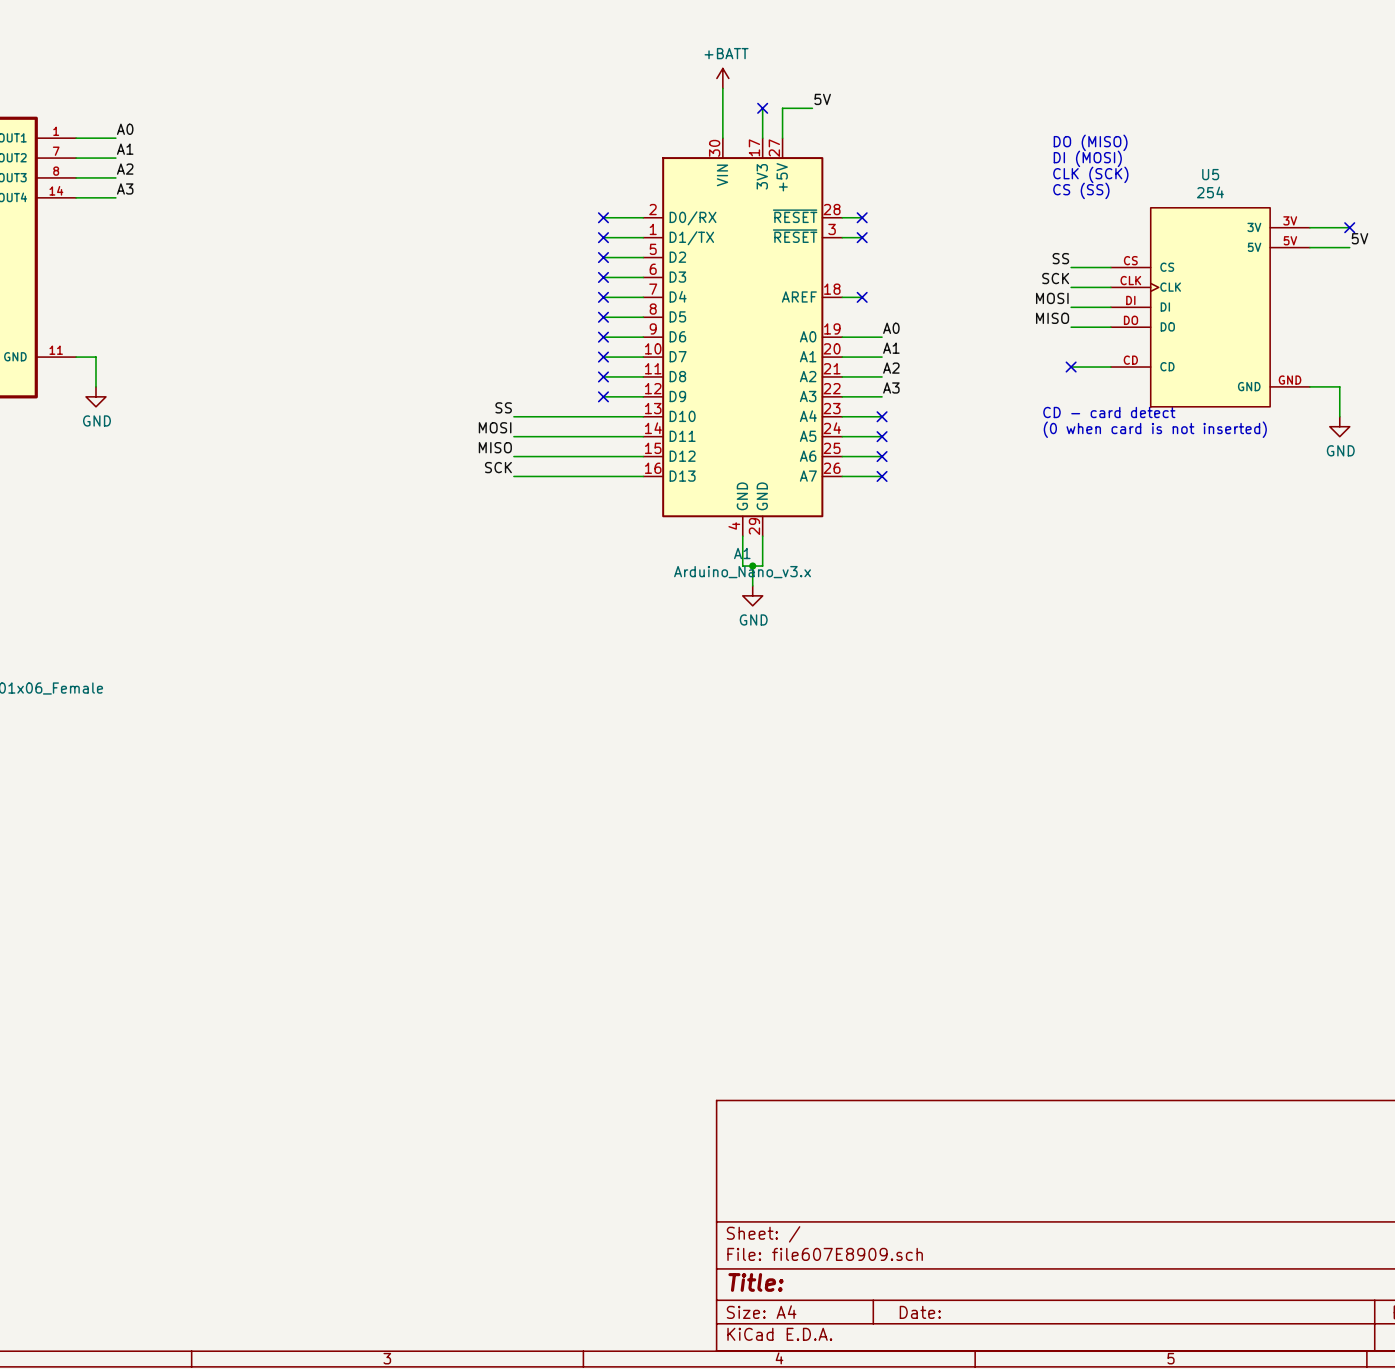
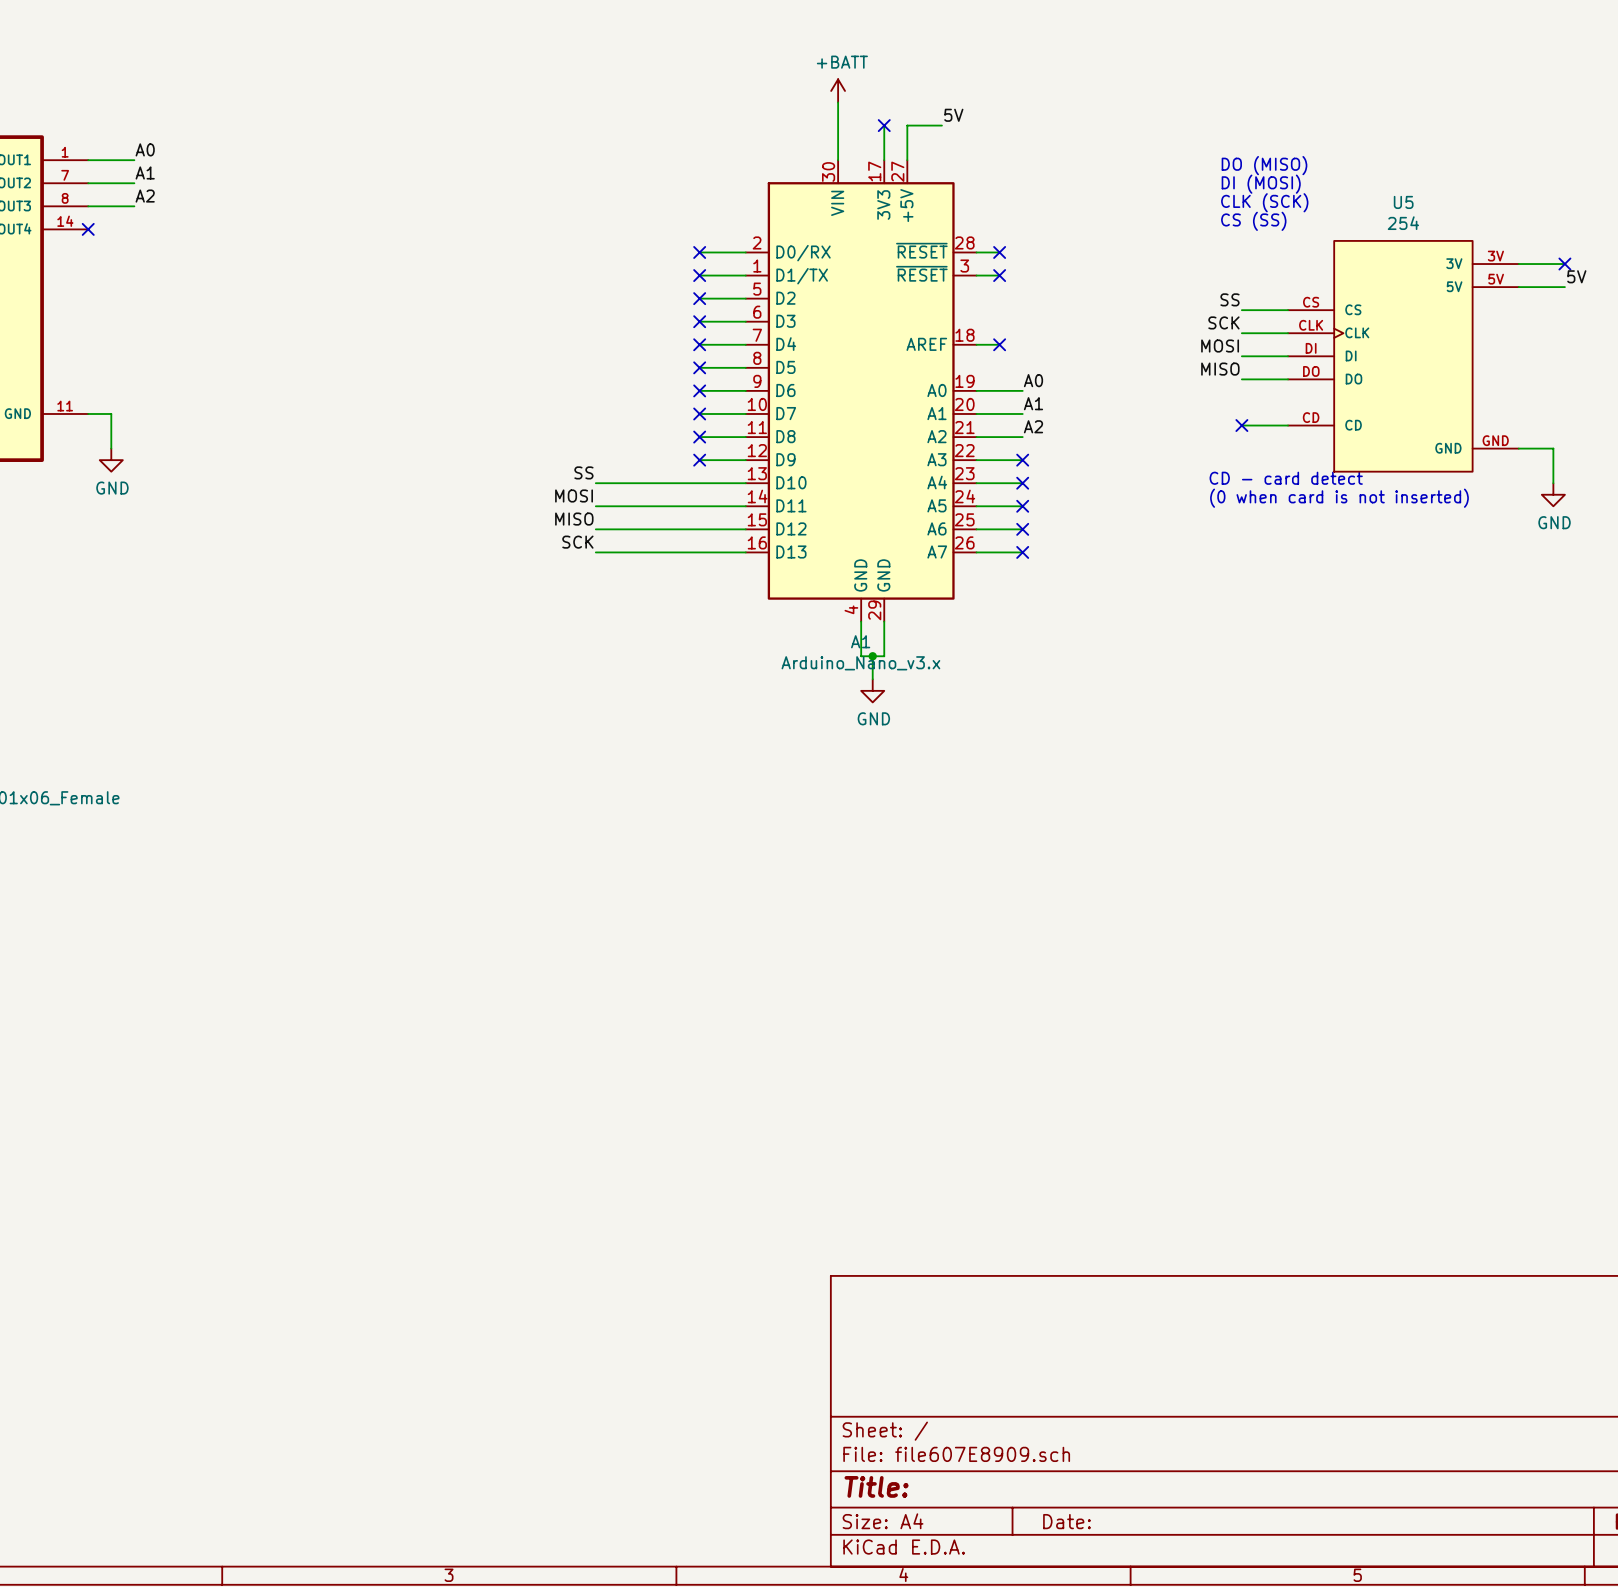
label: A3 (125, 188) -> none
wire: (76, 197) (115, 197) -> none
no-connect mark: none -> (88, 229)
label: A3 (891, 387) -> none
no-connect mark: none -> (1022, 460)

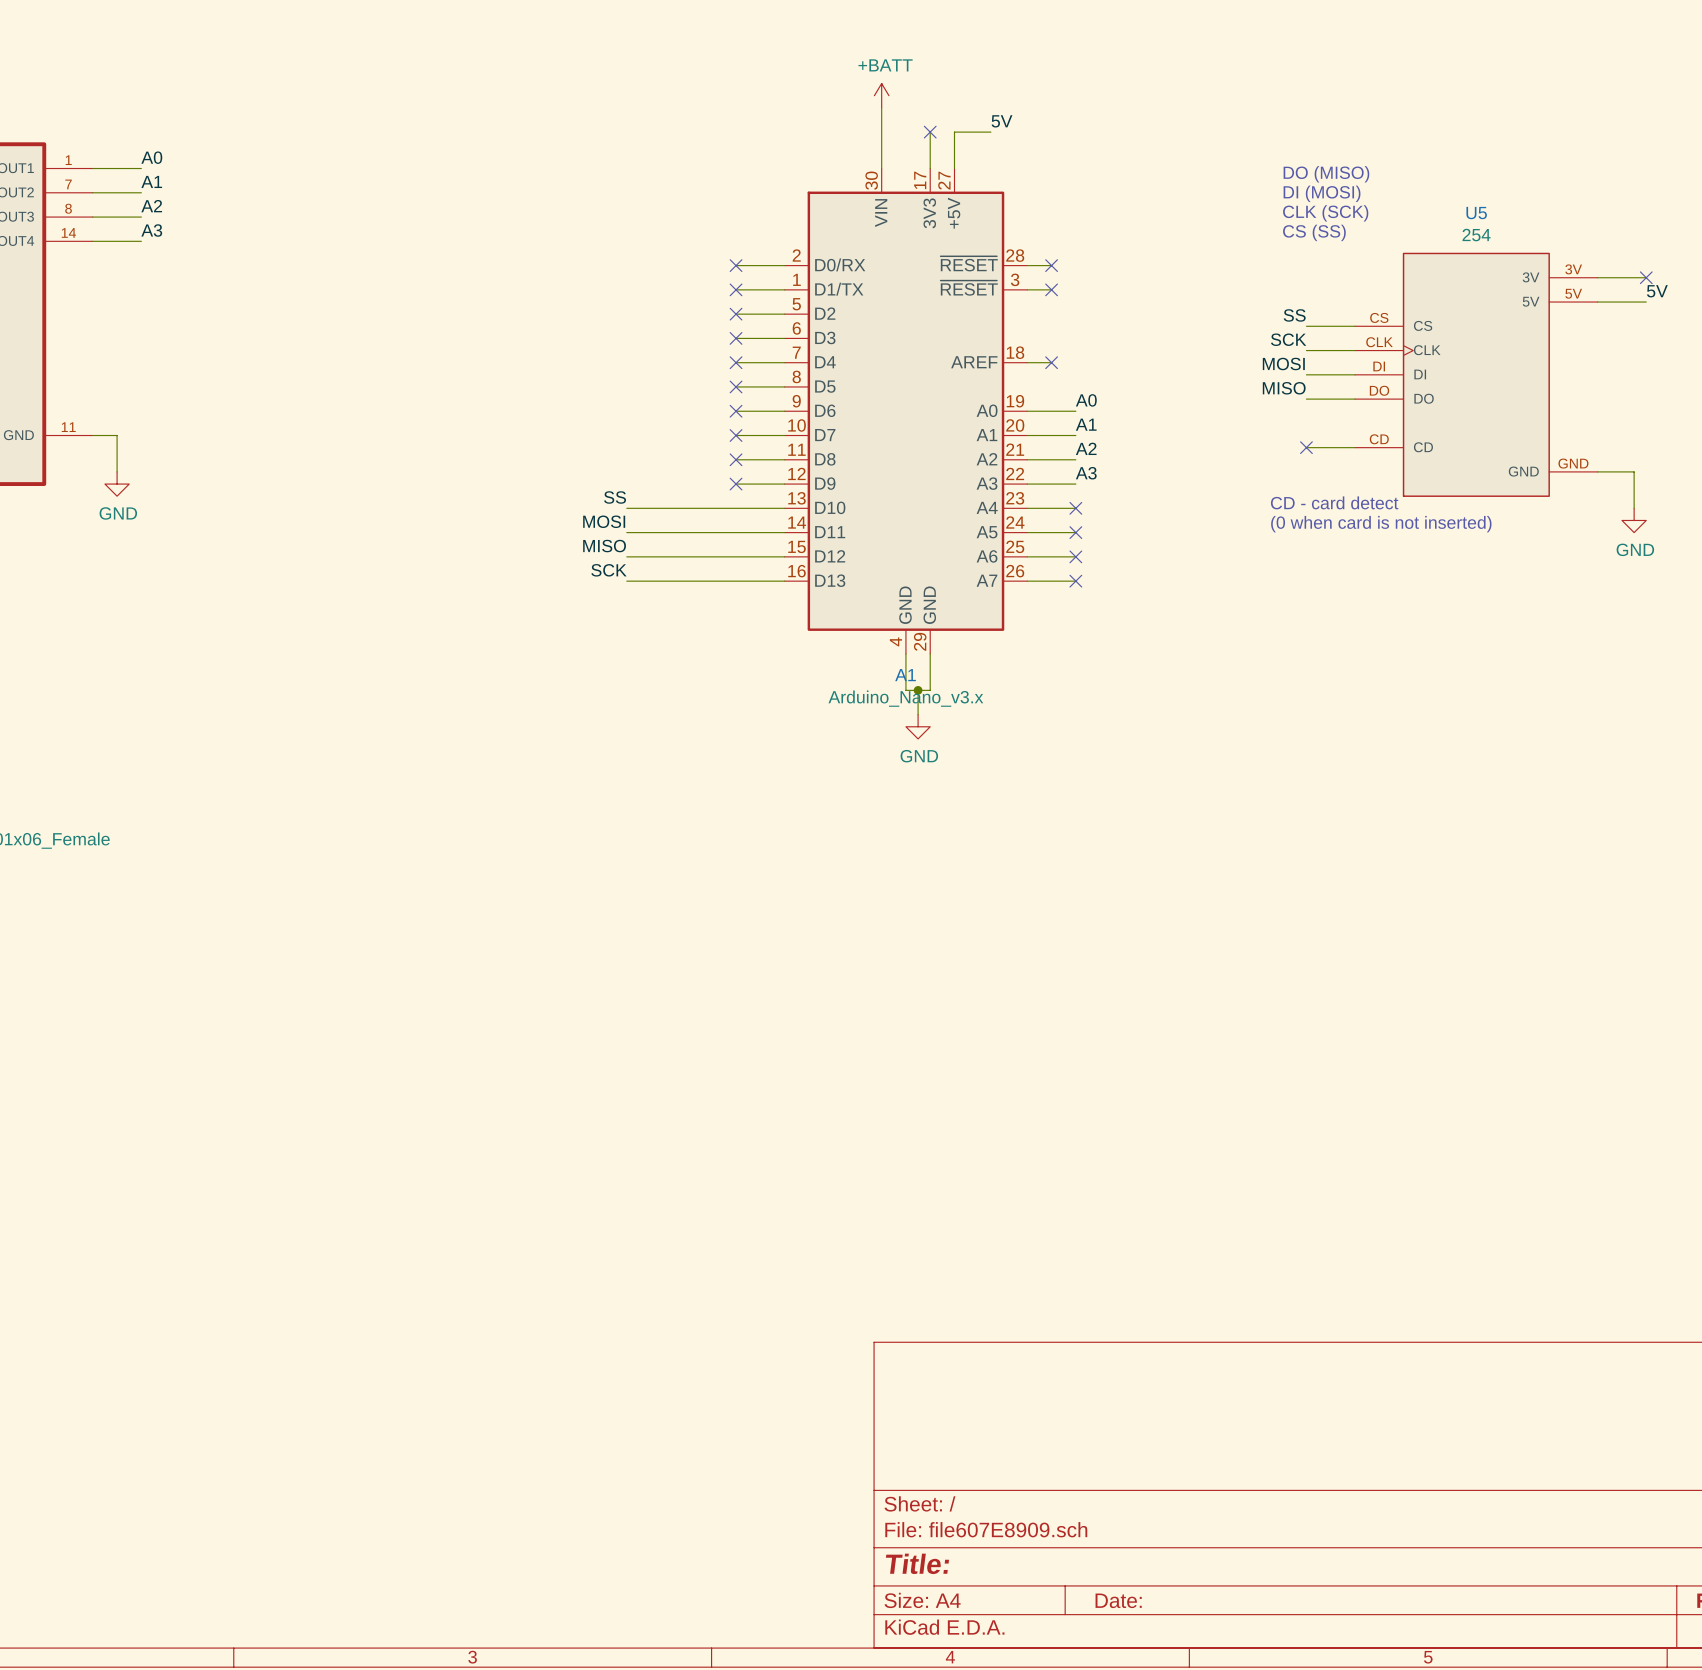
label: none -> A3 (151, 230)
wire: none -> (92, 241) (141, 241)
no-connect mark: (88, 229) -> none
label: none -> A3 (1086, 473)
no-connect mark: (1022, 460) -> none

